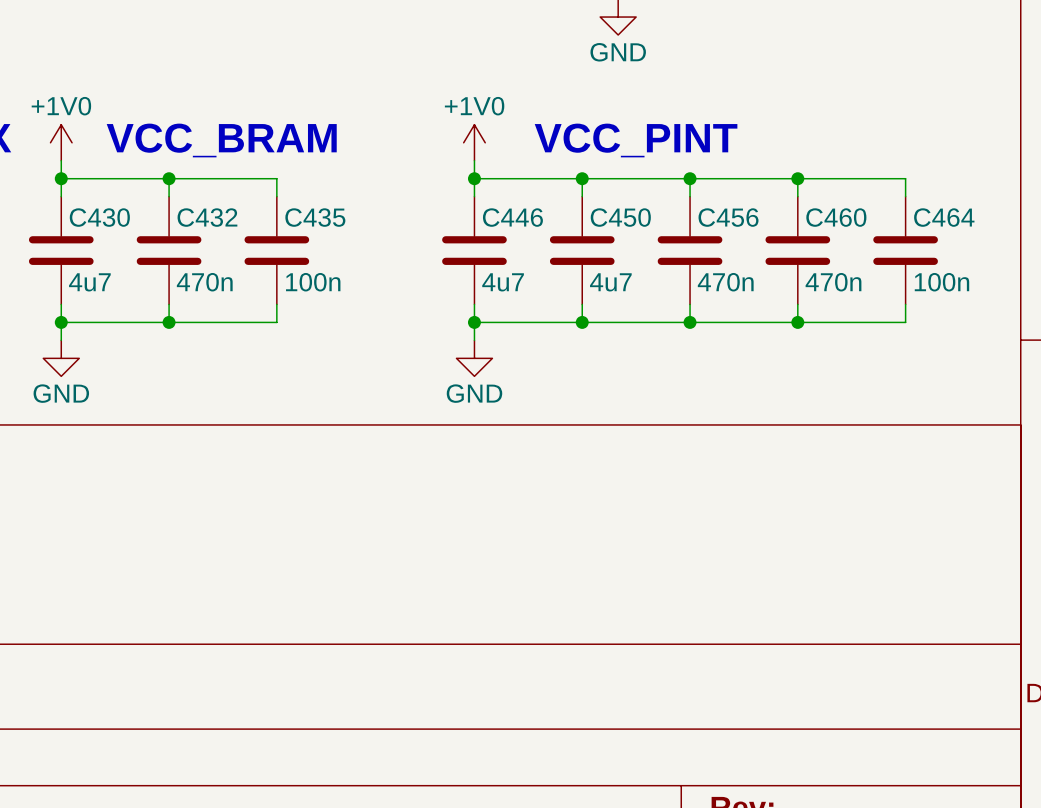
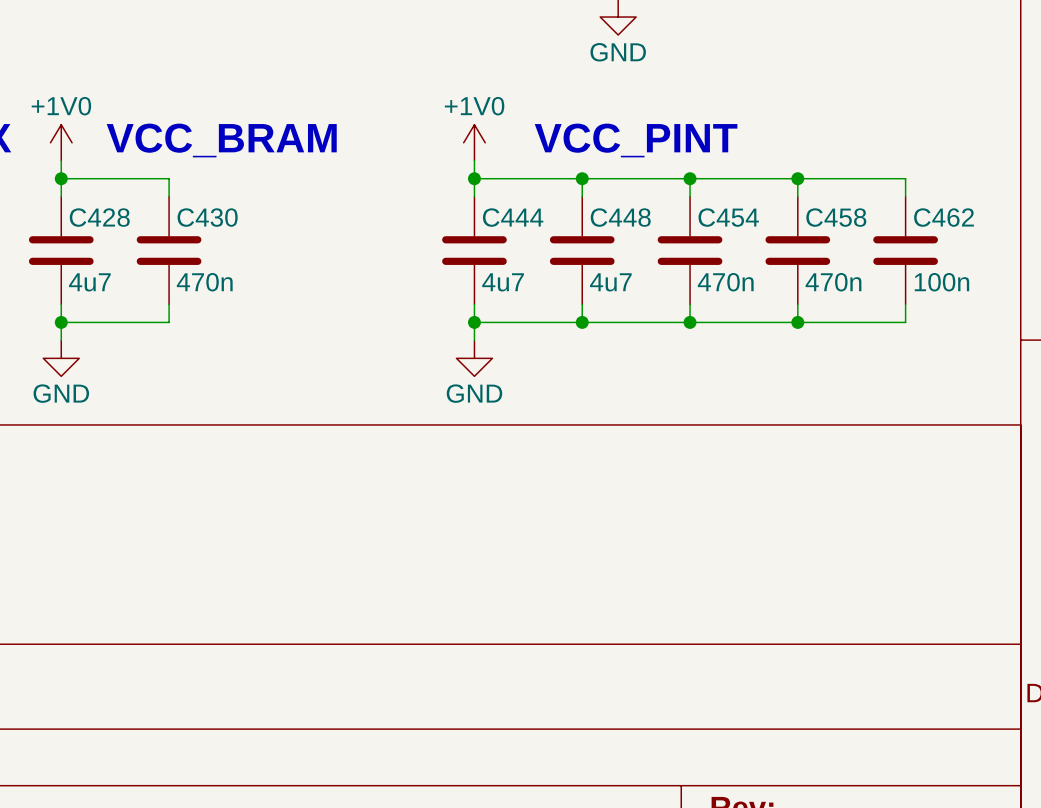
wire: (169, 178) (276, 178) (276, 196) -> none
junction: (169, 178) -> none
C430 name: C430 (99, 217) -> C428 (99, 217)
C432 name: C432 (207, 217) -> C430 (207, 217)
C446 name: C446 (512, 217) -> C444 (513, 217)
C450 name: C450 (620, 217) -> C448 (620, 217)
C456 name: C456 (728, 217) -> C454 (728, 217)
C460 name: C460 (836, 217) -> C458 (836, 217)
C464 name: C464 (944, 217) -> C462 (944, 217)
C435: 100n (276, 250) -> none
wire: (276, 304) (276, 322) (169, 322) -> none
junction: (169, 322) -> none

